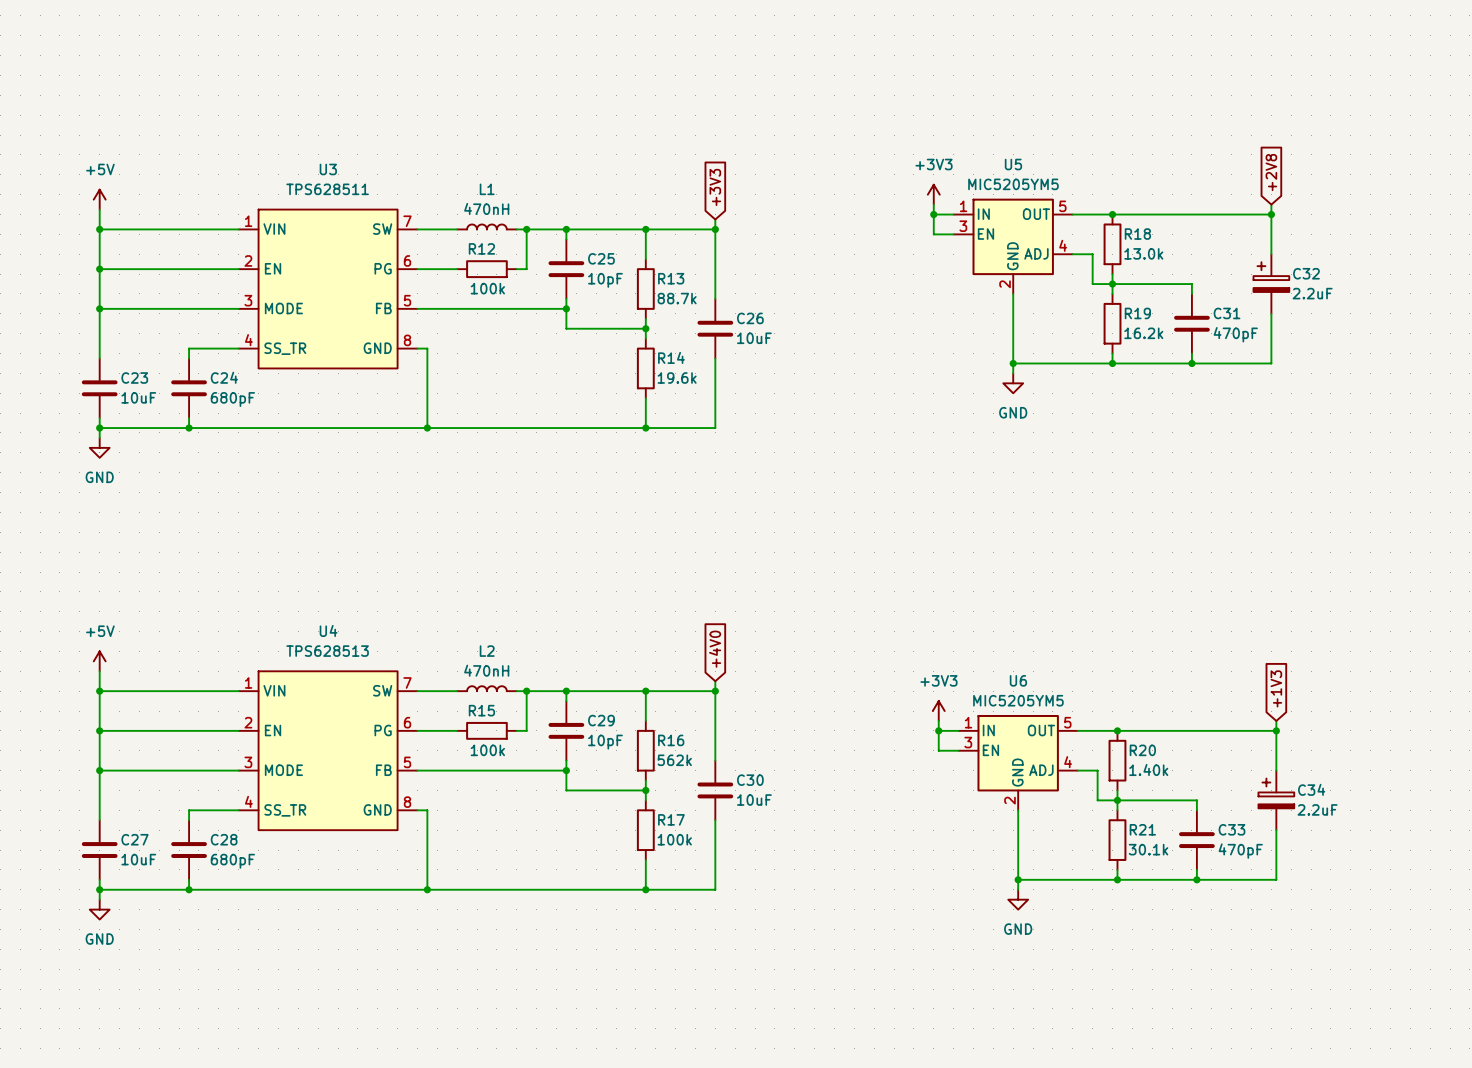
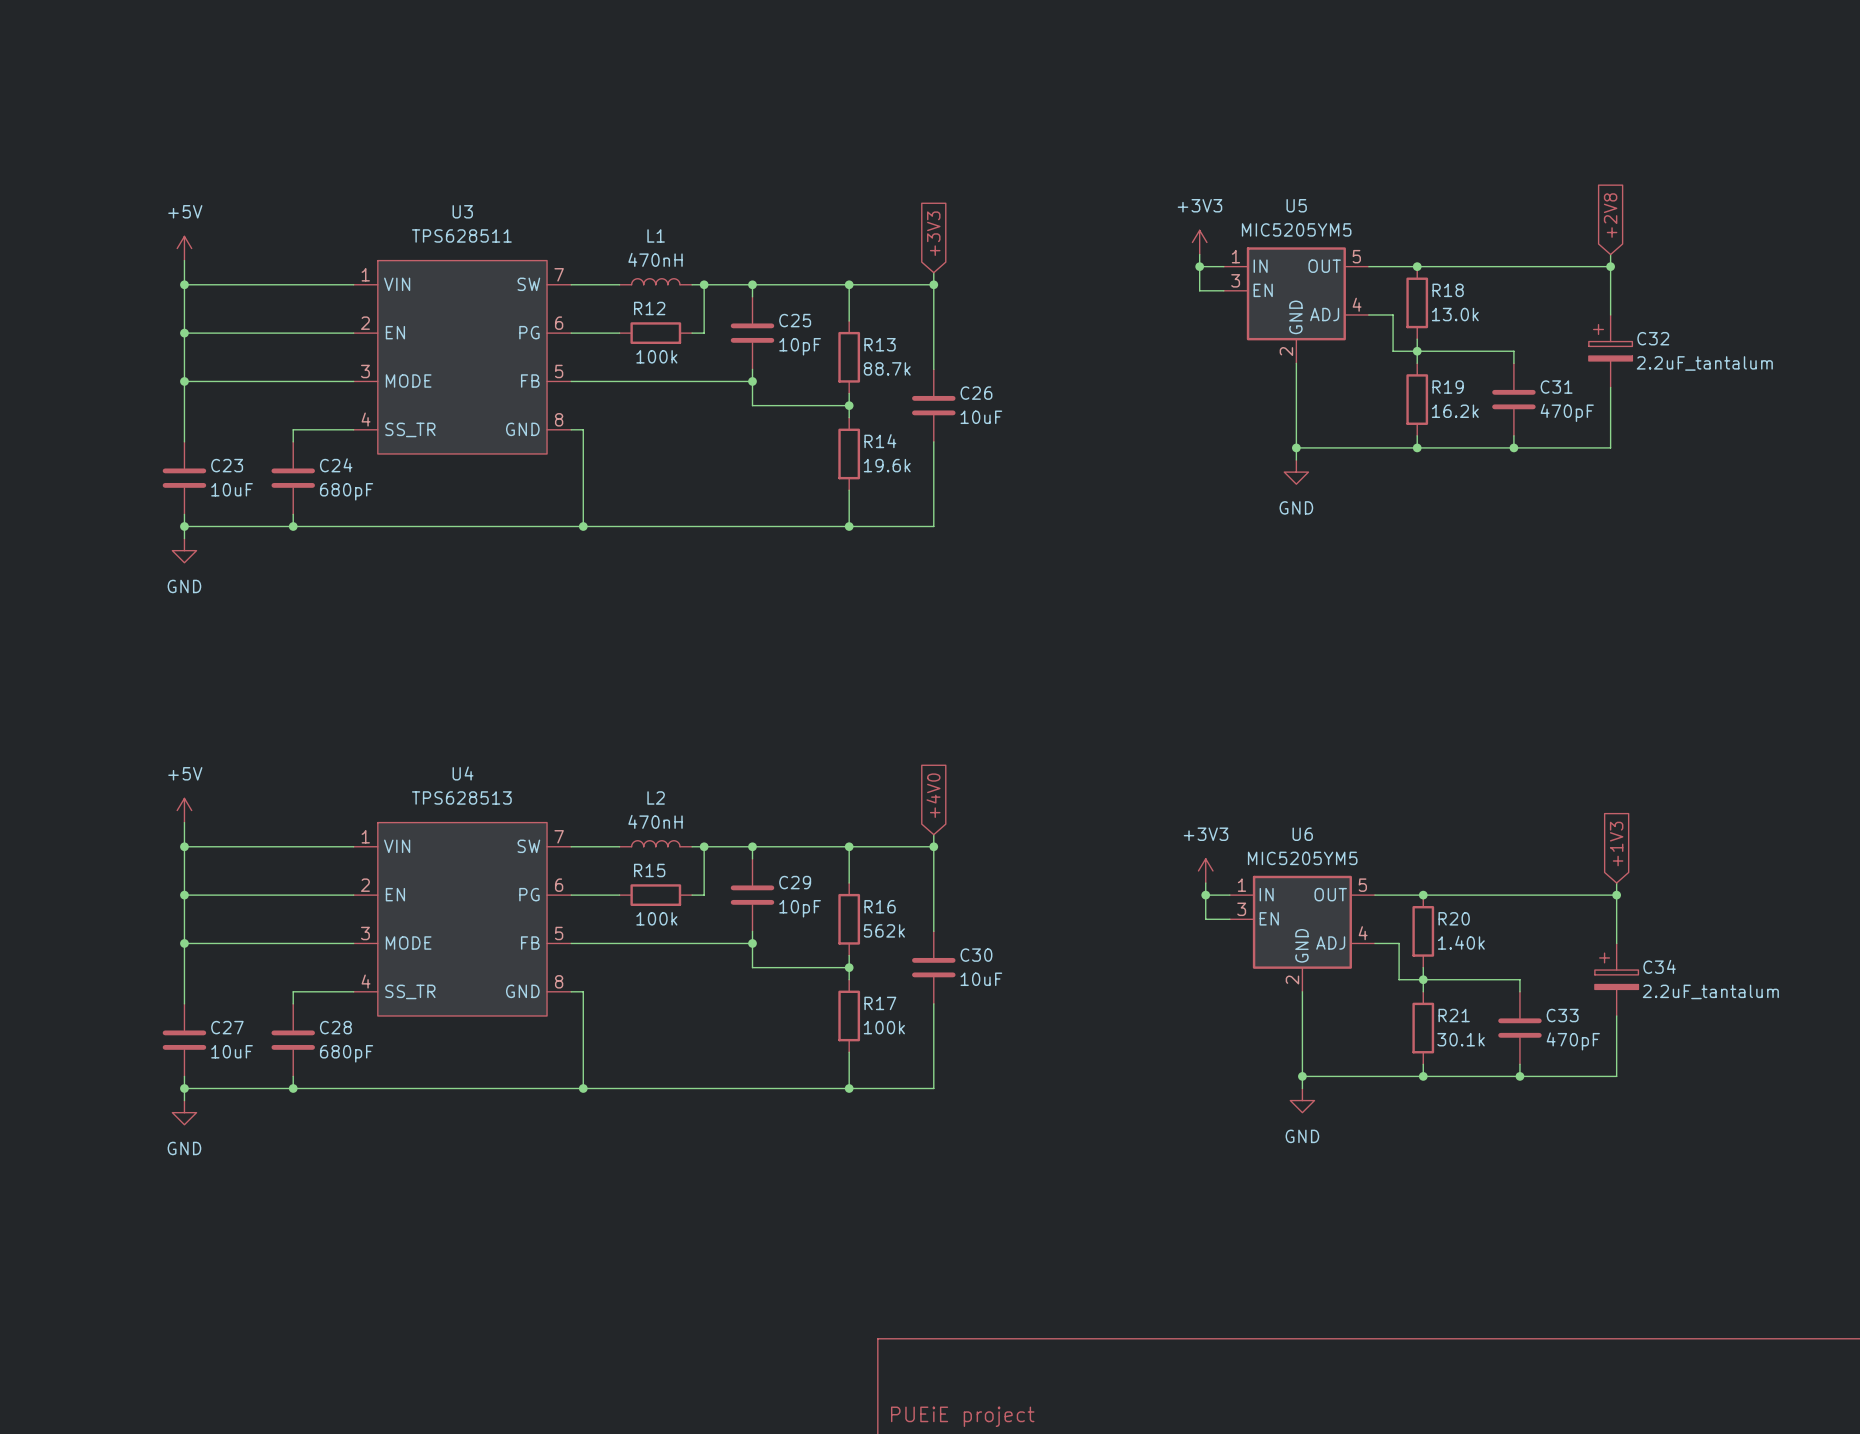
C32 value: 2.2uF (1312, 293) -> 2.2uF_tantalum (1704, 363)
C34 value: 2.2uF (1317, 809) -> 2.2uF_tantalum (1710, 991)

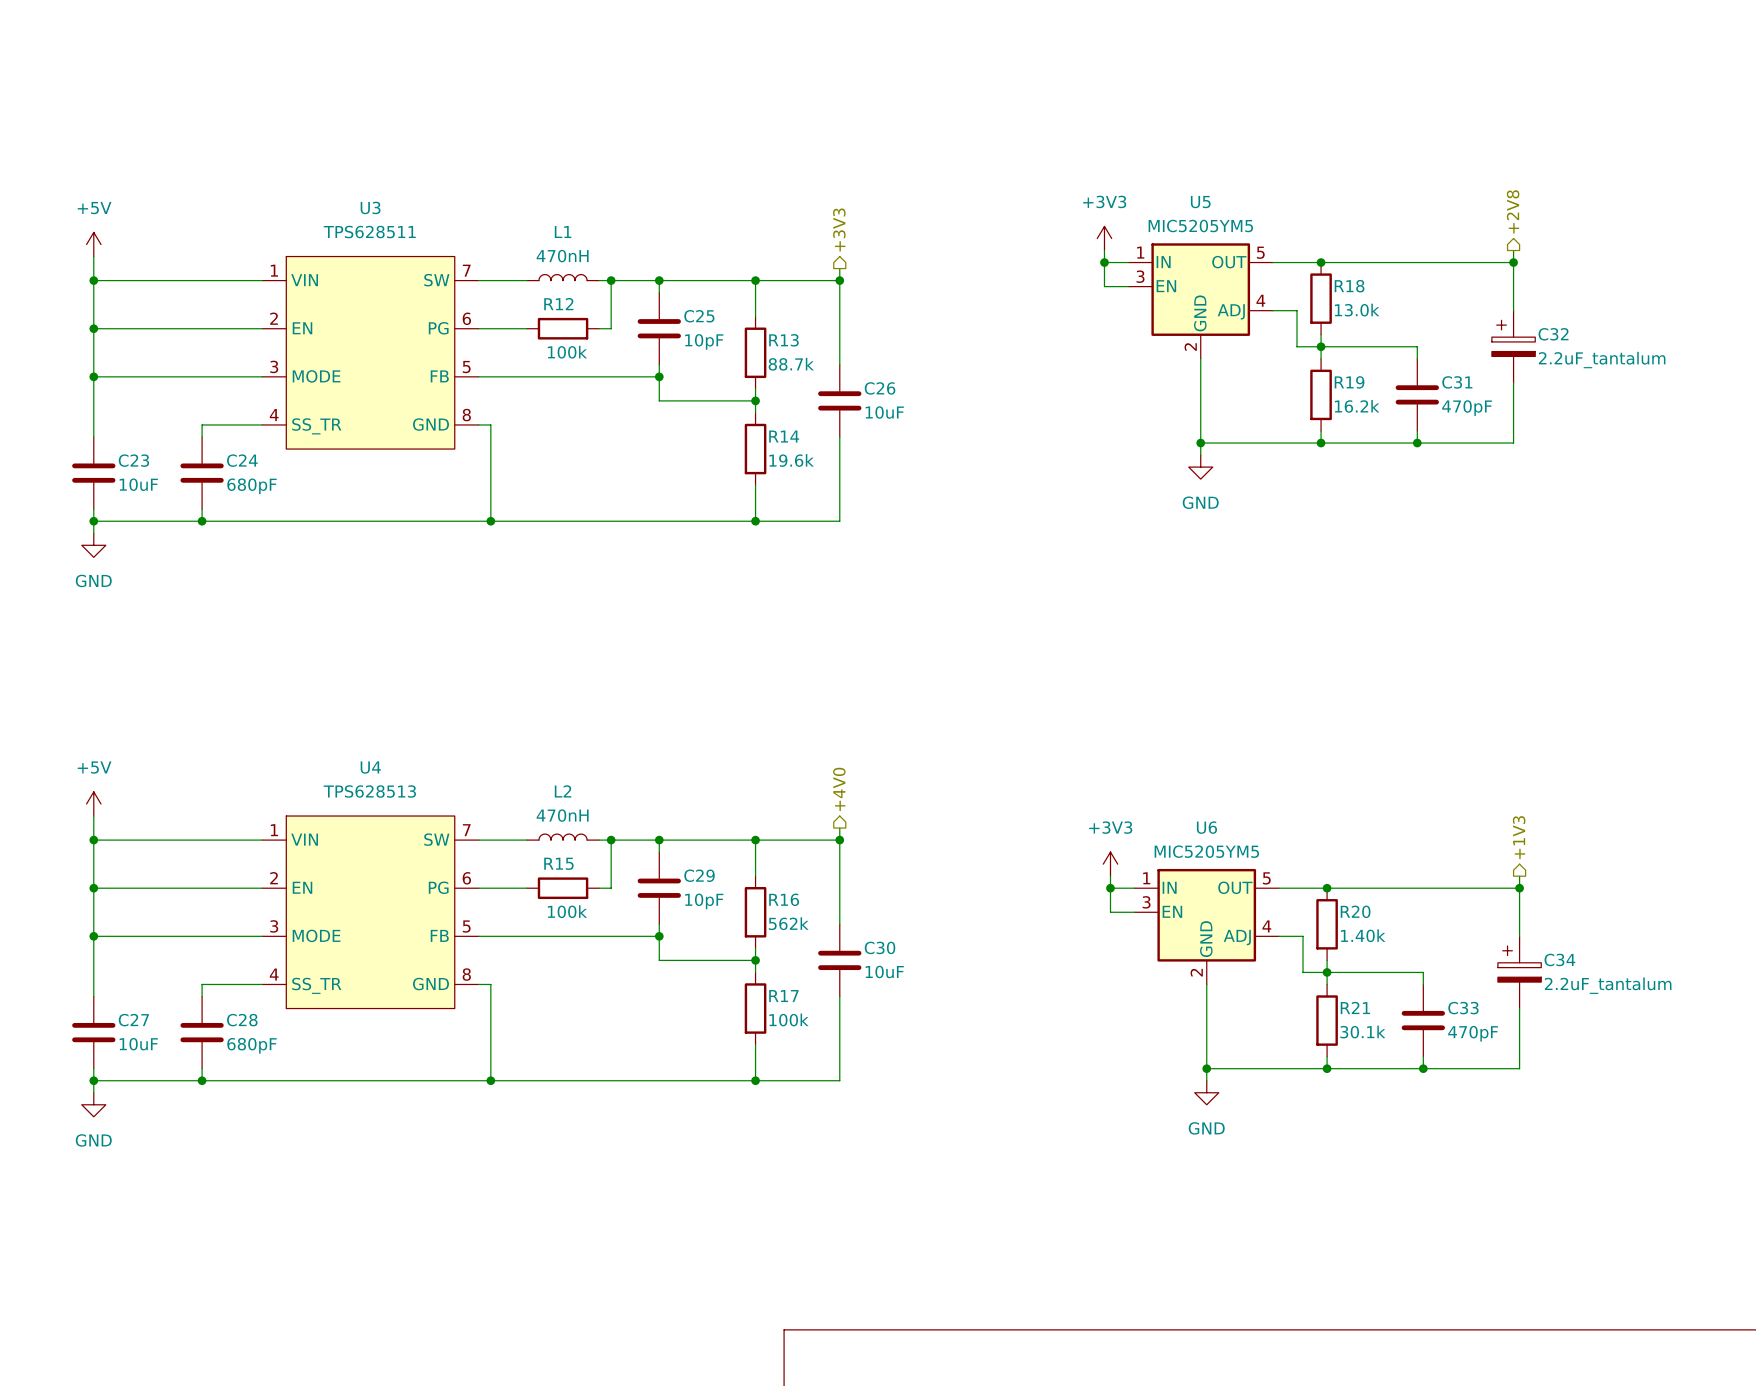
hierarchical label: none -> +2V8 (1513, 211)
global label: +2V8 (1610, 215) -> none
hierarchical label: none -> +3V3 (839, 230)
global label: +3V3 (933, 233) -> none
hierarchical label: none -> +4V0 (839, 789)
global label: +4V0 (933, 795) -> none
hierarchical label: none -> +1V3 (1519, 837)
global label: +1V3 (1616, 844) -> none

